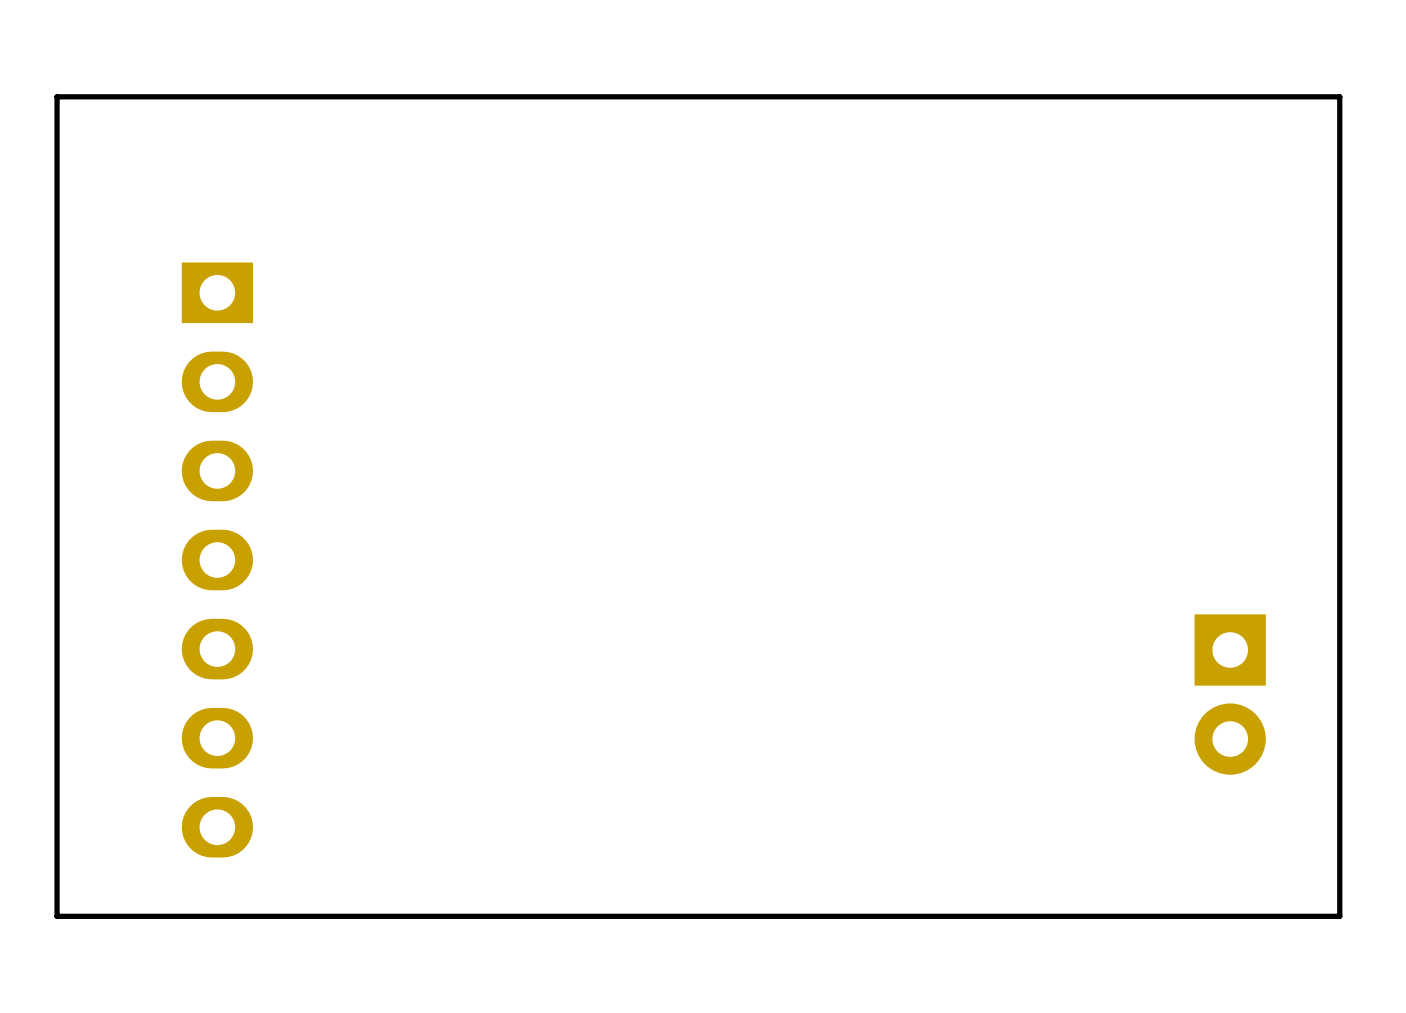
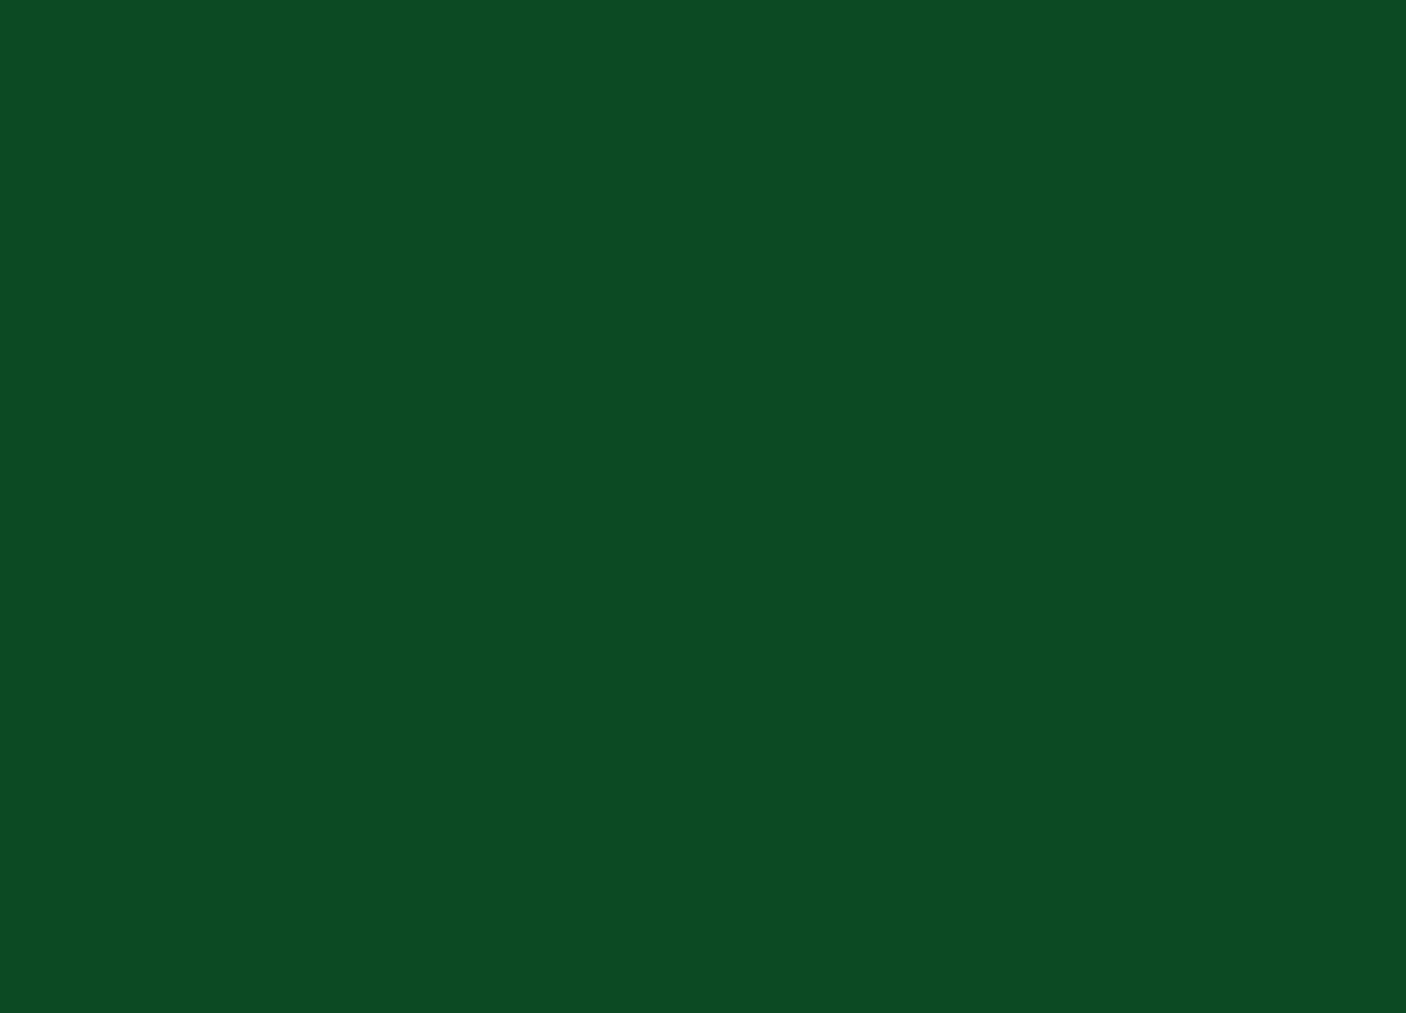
board edge: (1339, 96) (57, 96) (57, 916) (1339, 916) (1339, 96) -> none
part: (217, 560) -> none
part: (1230, 694) -> none

